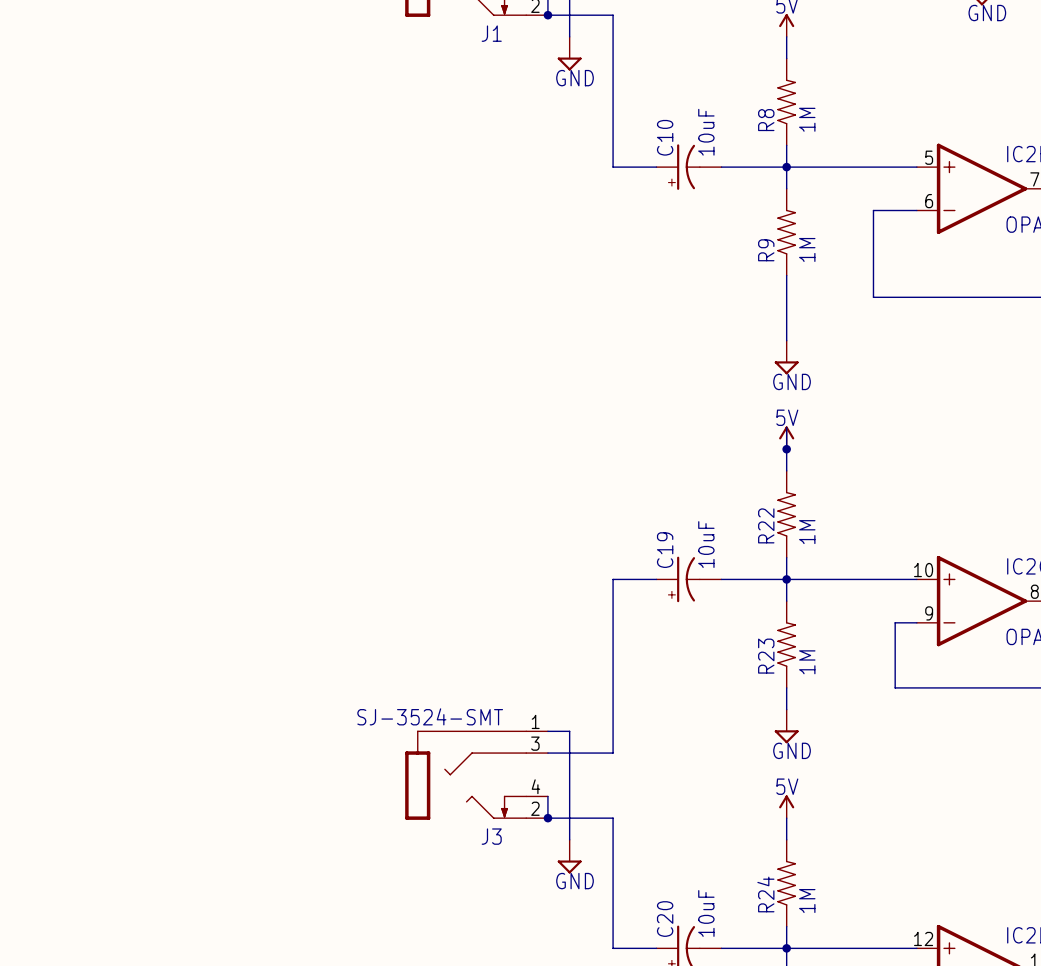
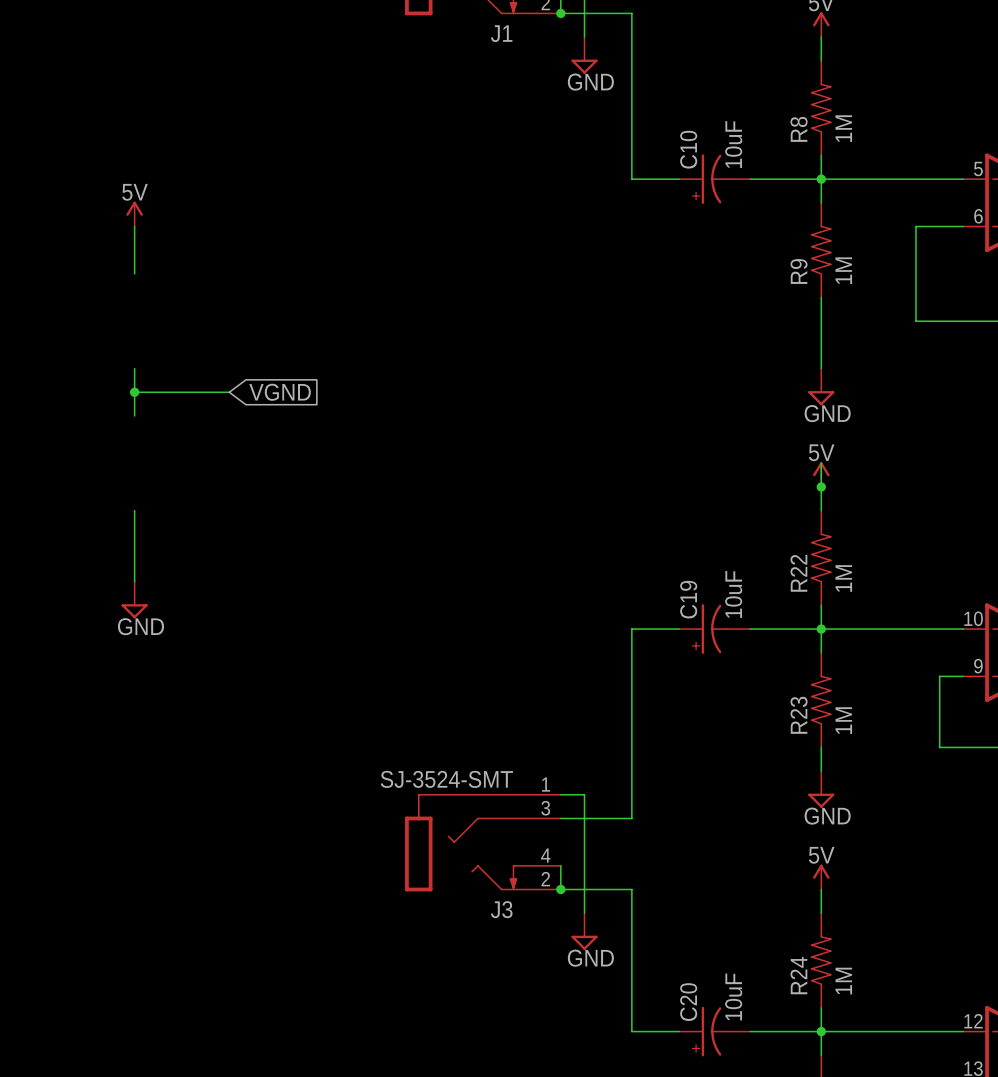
power symbol: none -> 5V (134, 214)
wire: none -> (134, 226) (134, 273)
wire: none -> (134, 368) (134, 415)
wire: none -> (134, 392) (229, 392)
junction: none -> (134, 392)
global label: none -> VGND (280, 392)
wire: none -> (134, 510) (134, 581)
power symbol: none -> GND (134, 600)

